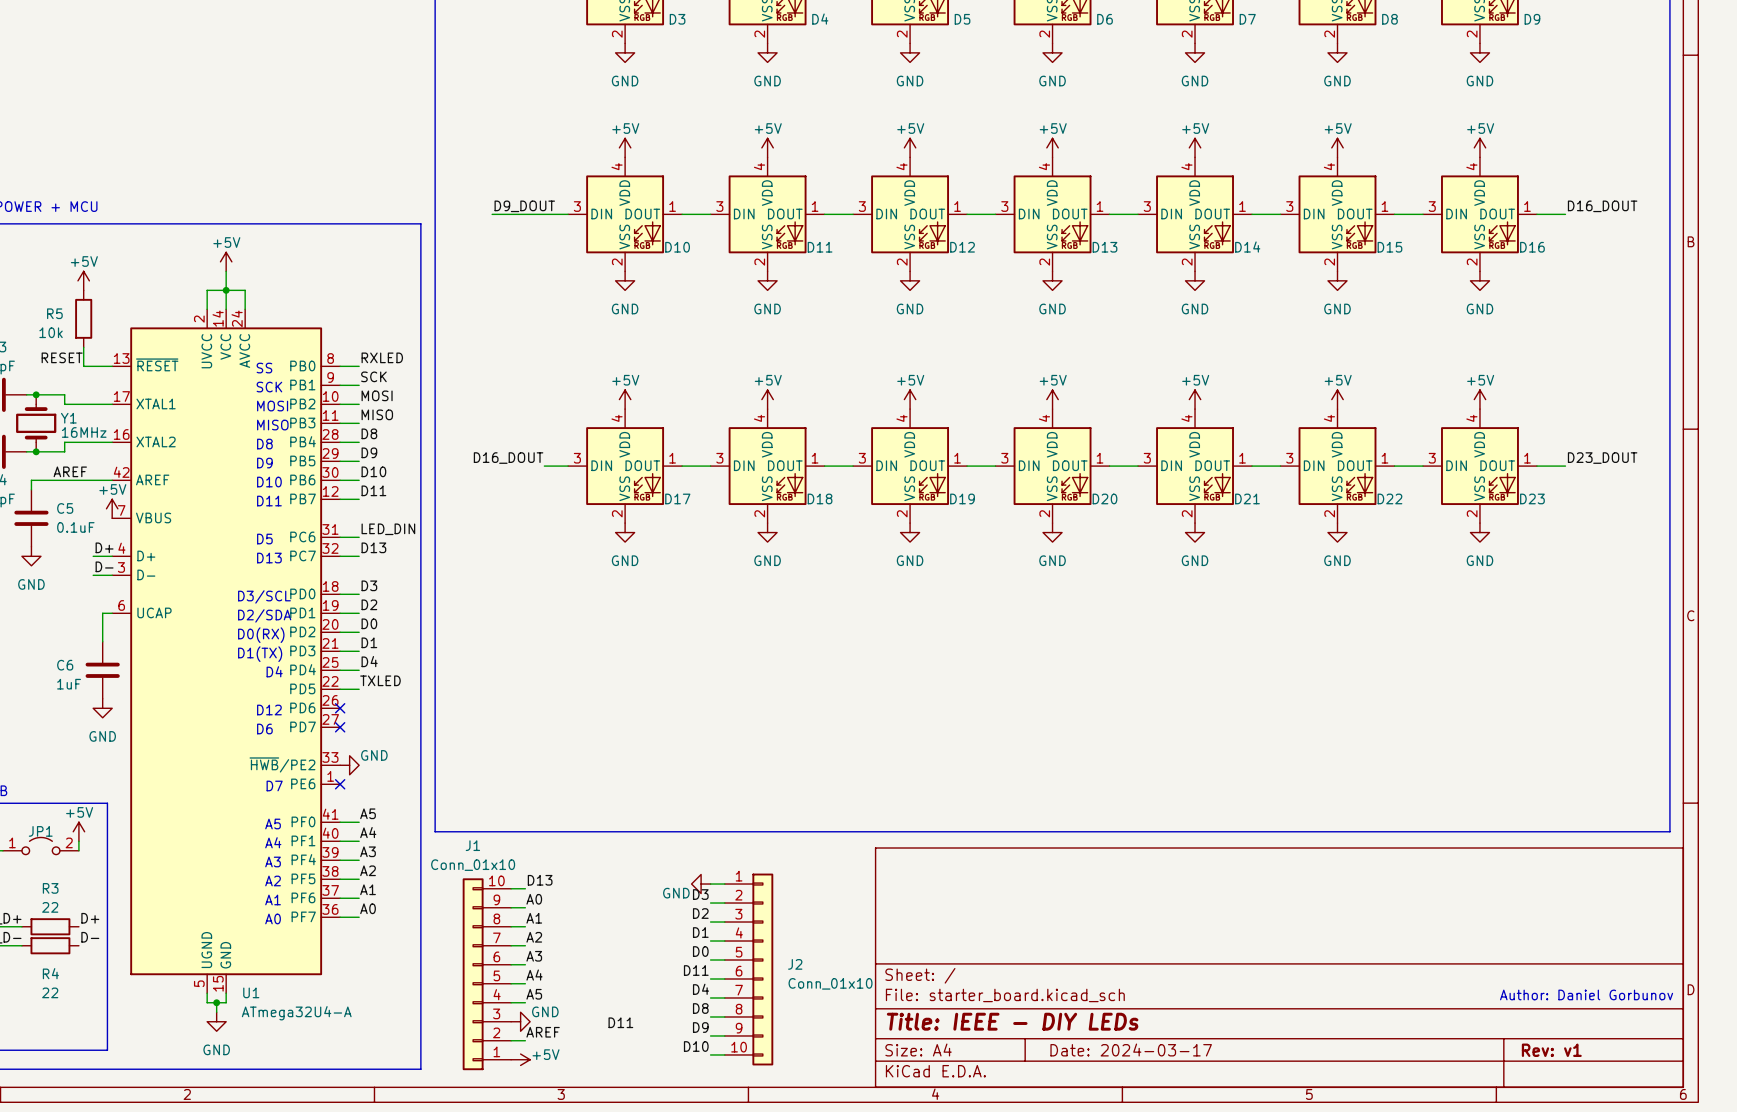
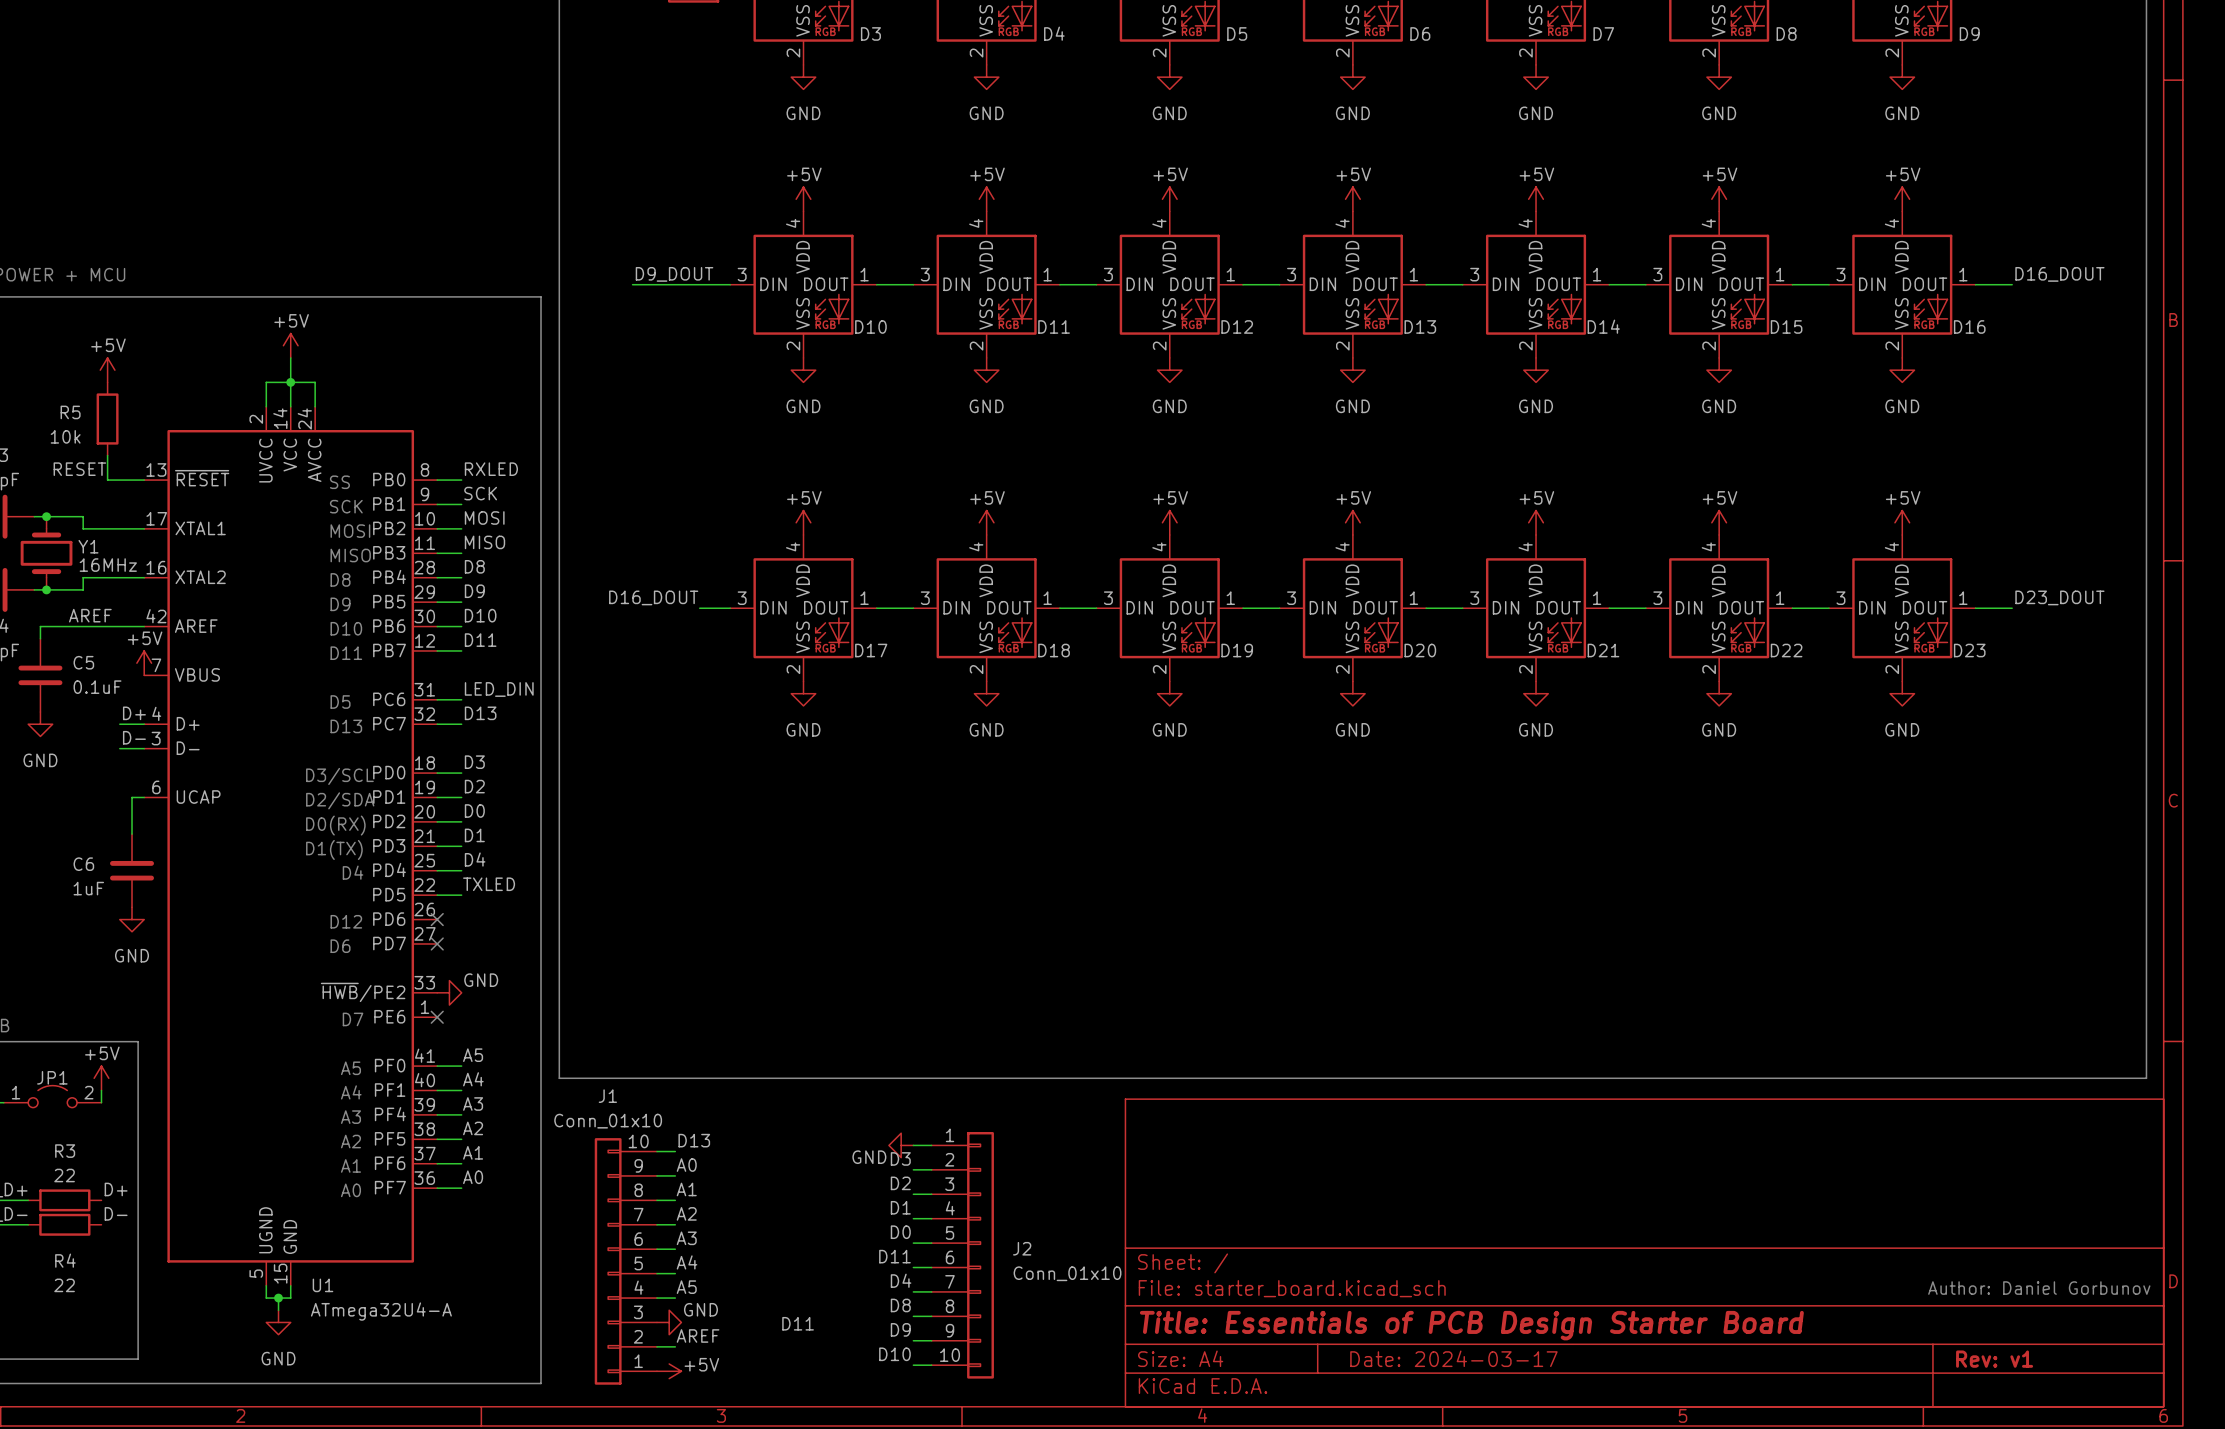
title block: Title: IEEE - DIY LEDs (1012, 1021) -> Title: Essentials of PCB Design Starter Board (1471, 1325)

